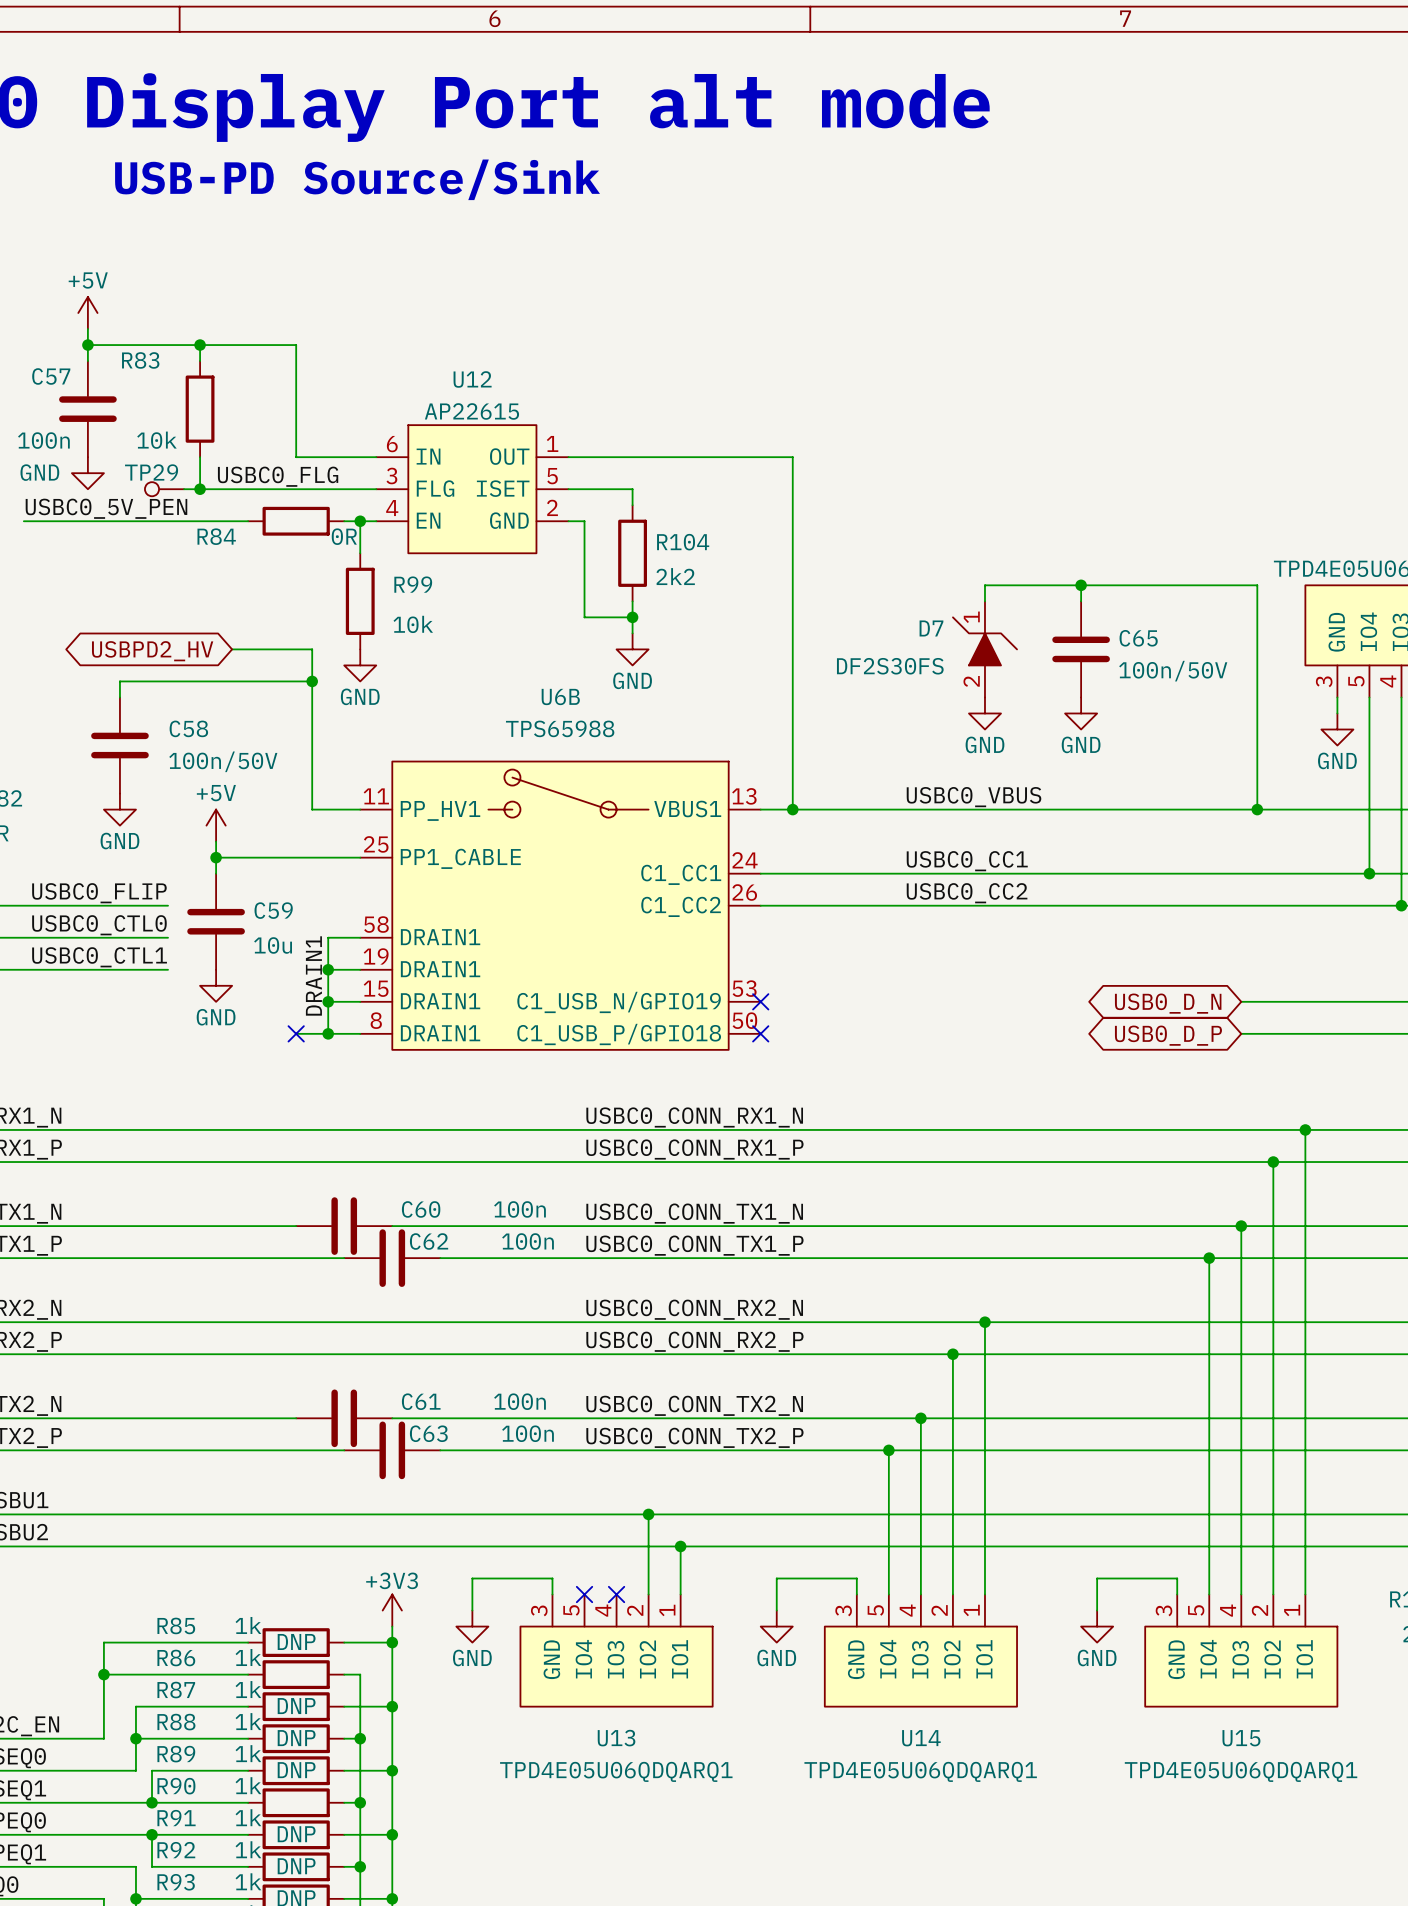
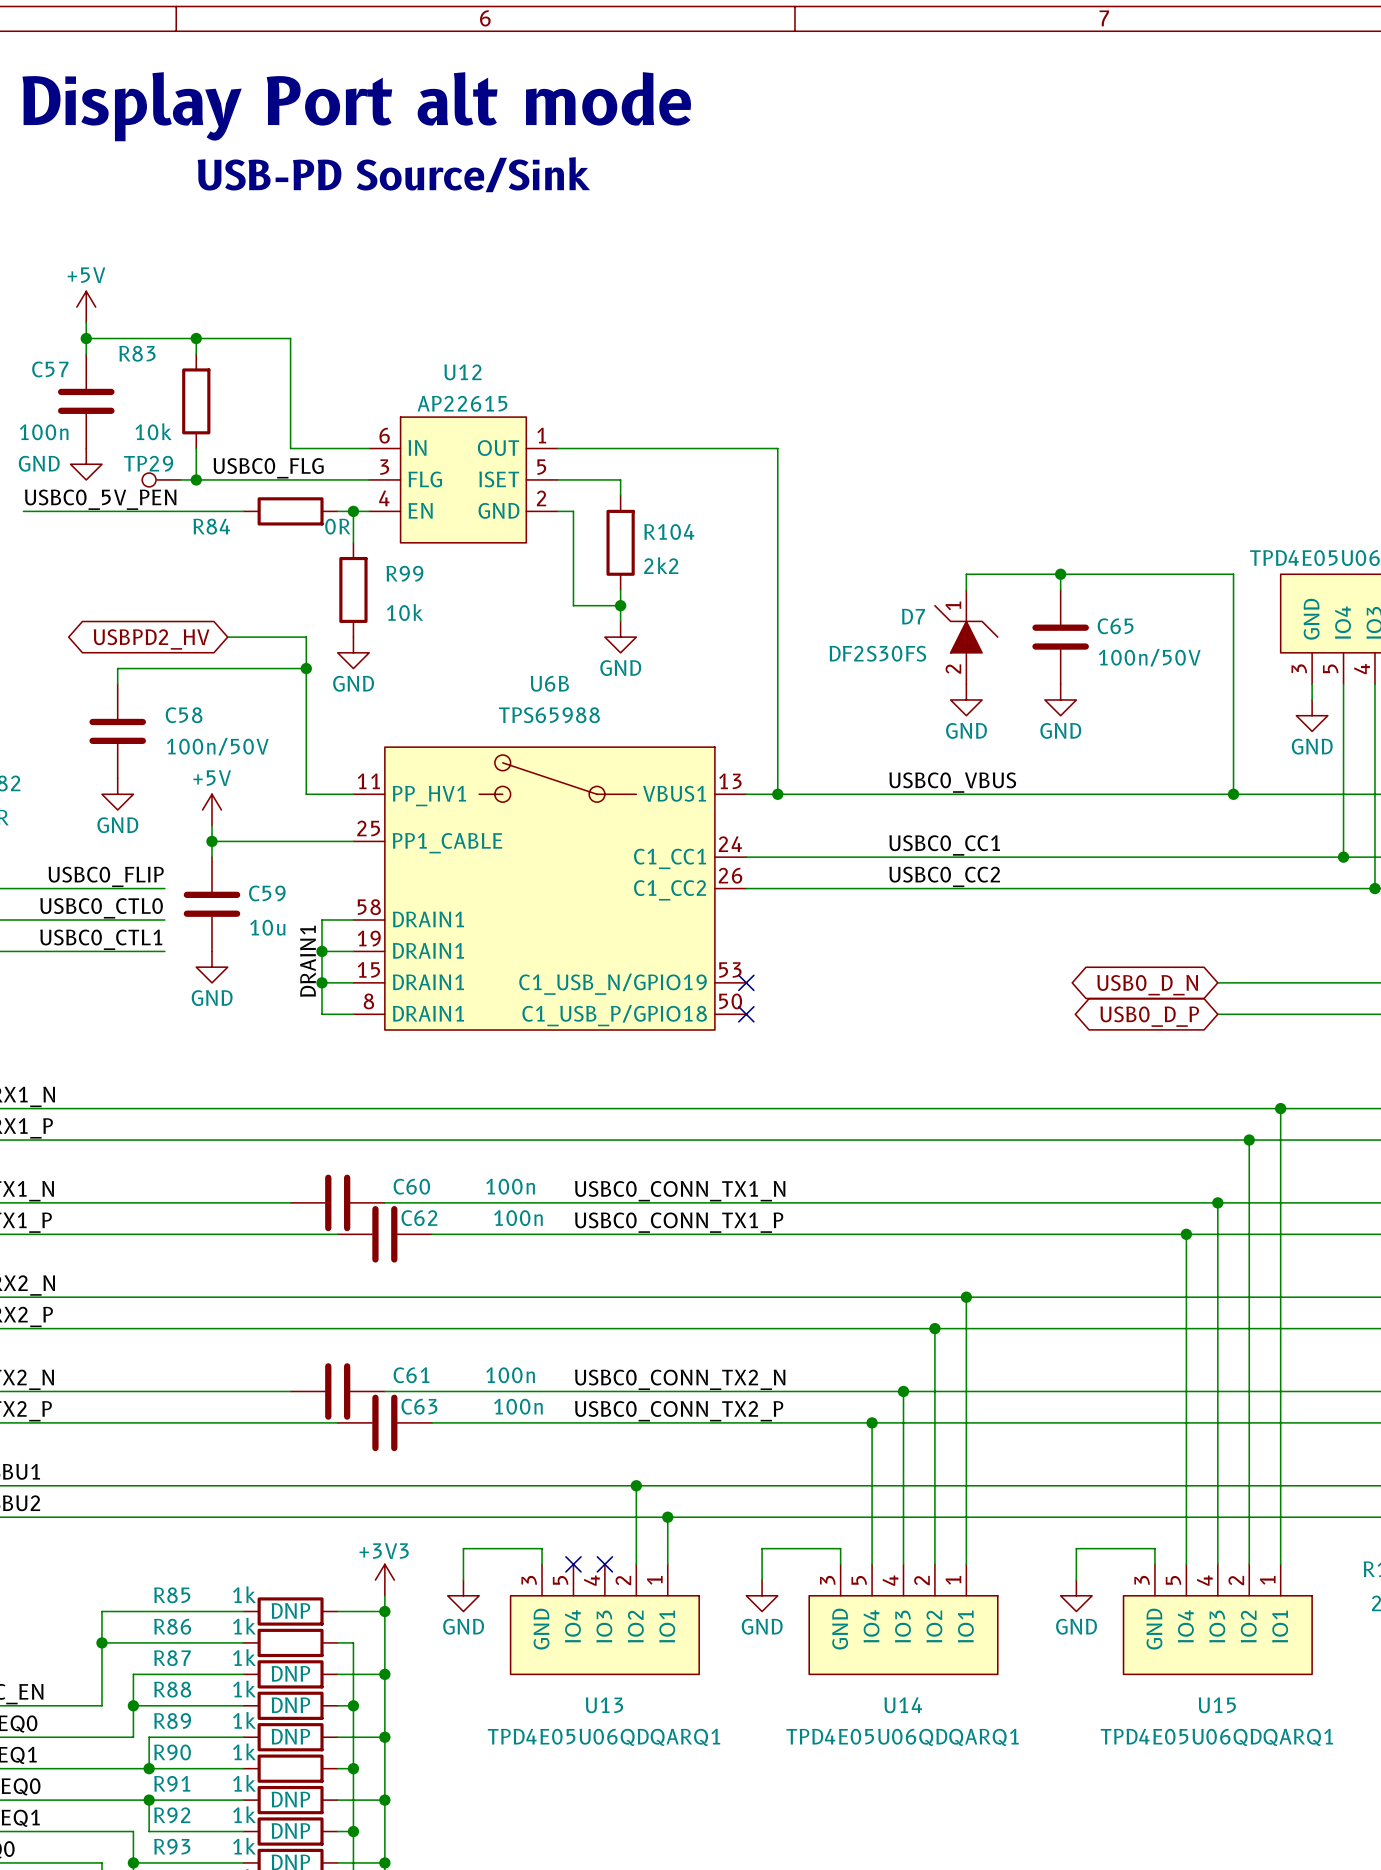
wire: (296, 1033) (328, 1033) -> none
no-connect mark: (296, 1033) -> none
junction: (328, 1033) -> none
label: USBC0_CONN_RX1_N (694, 1117) -> none
label: USBC0_CONN_RX1_P (694, 1149) -> none
label: USBC0_CONN_RX2_N (694, 1309) -> none
label: USBC0_CONN_RX2_P (694, 1341) -> none

